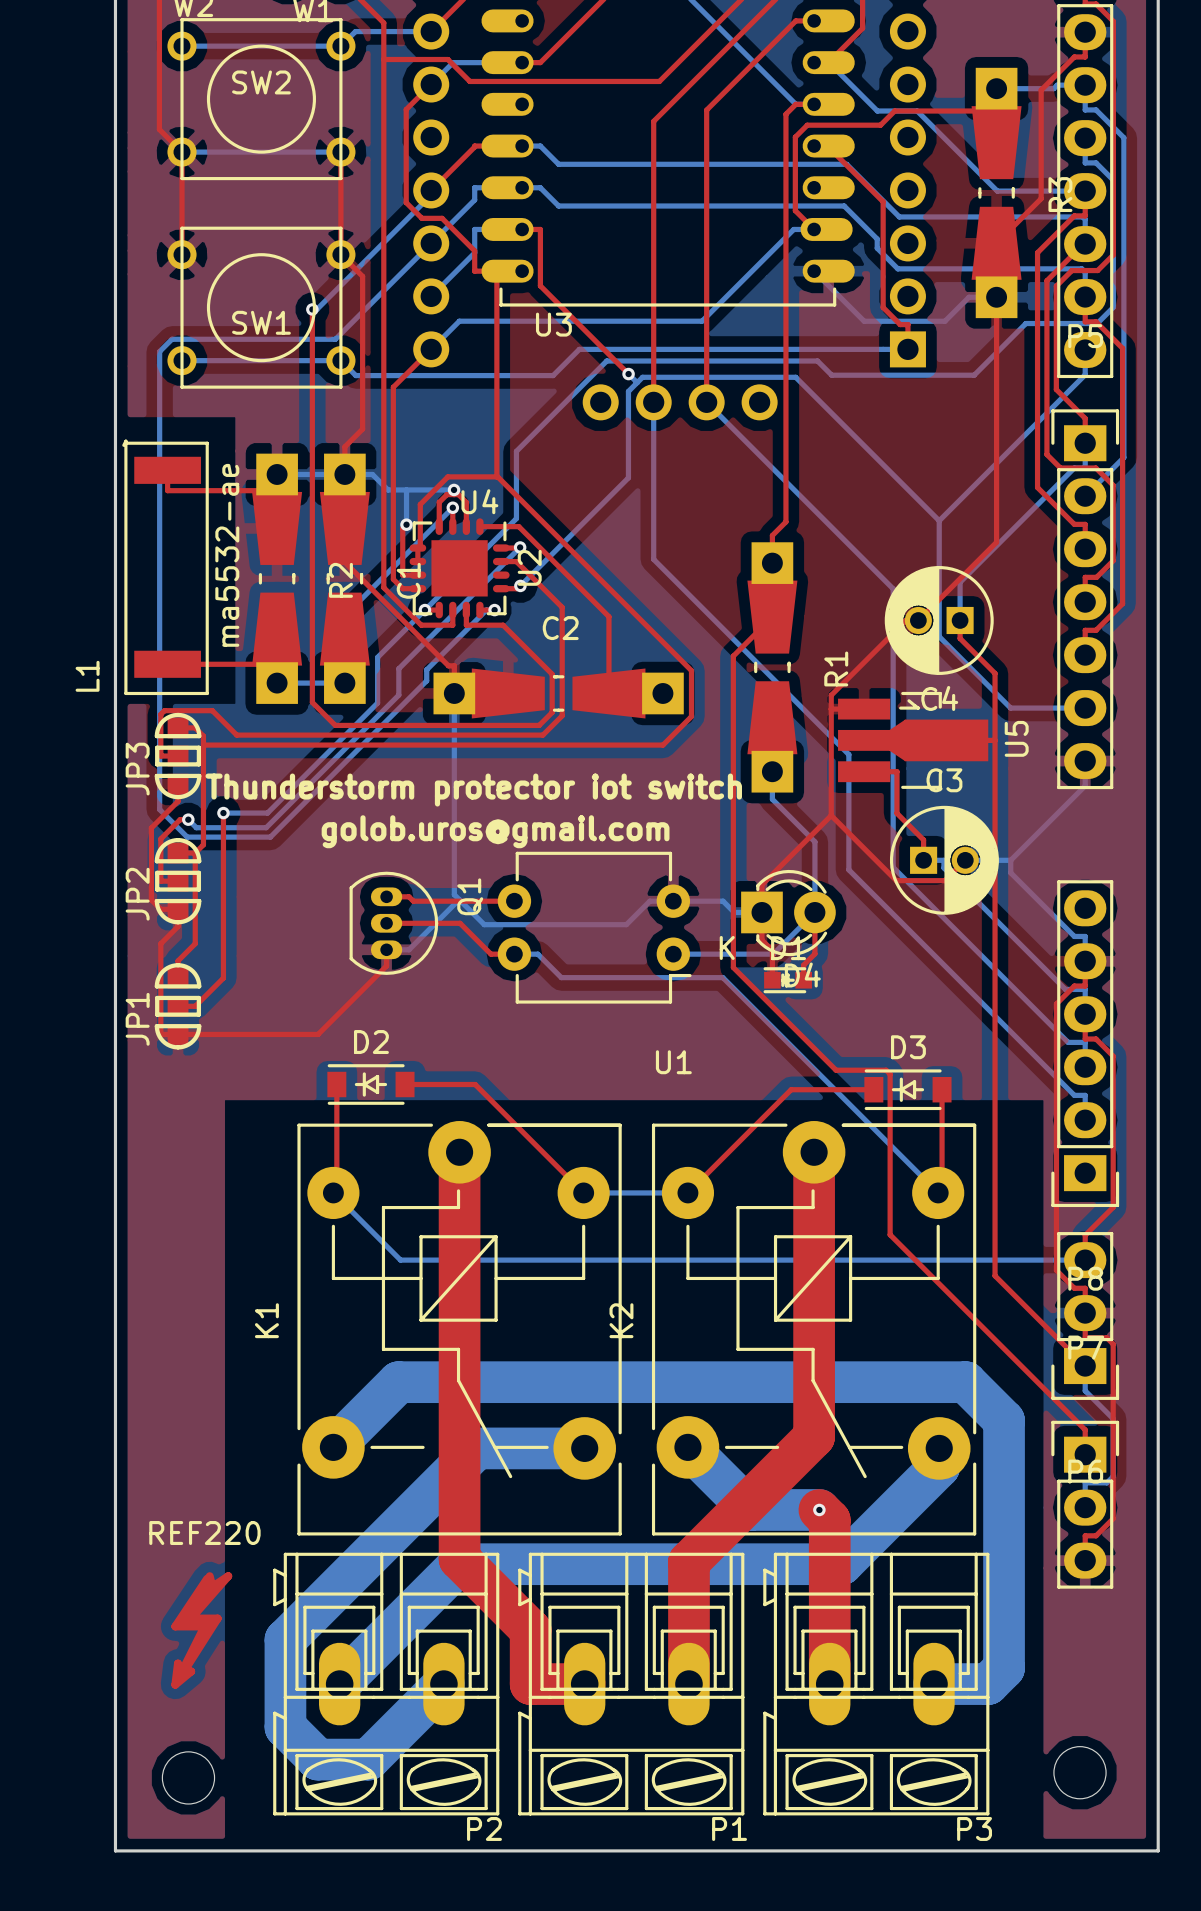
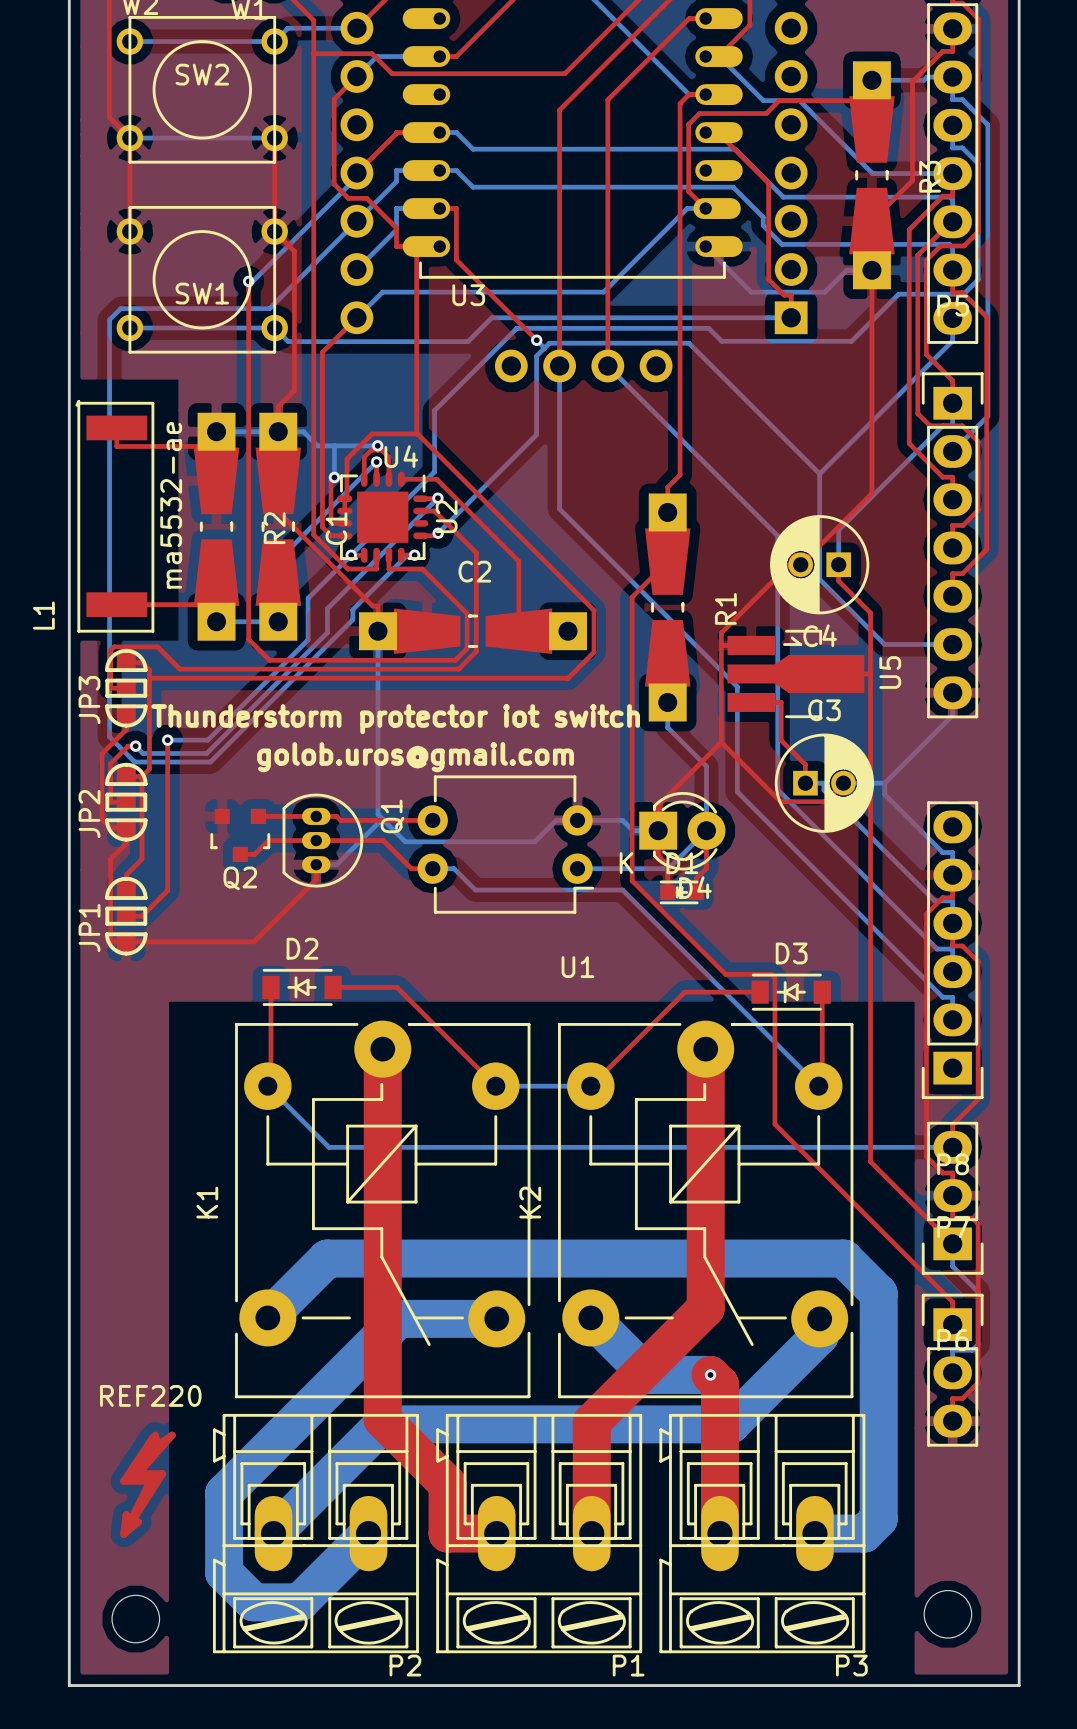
Q2: none -> (240, 835)
top track: none -> (316, 840) (268, 840) (254, 854) (240, 854)

